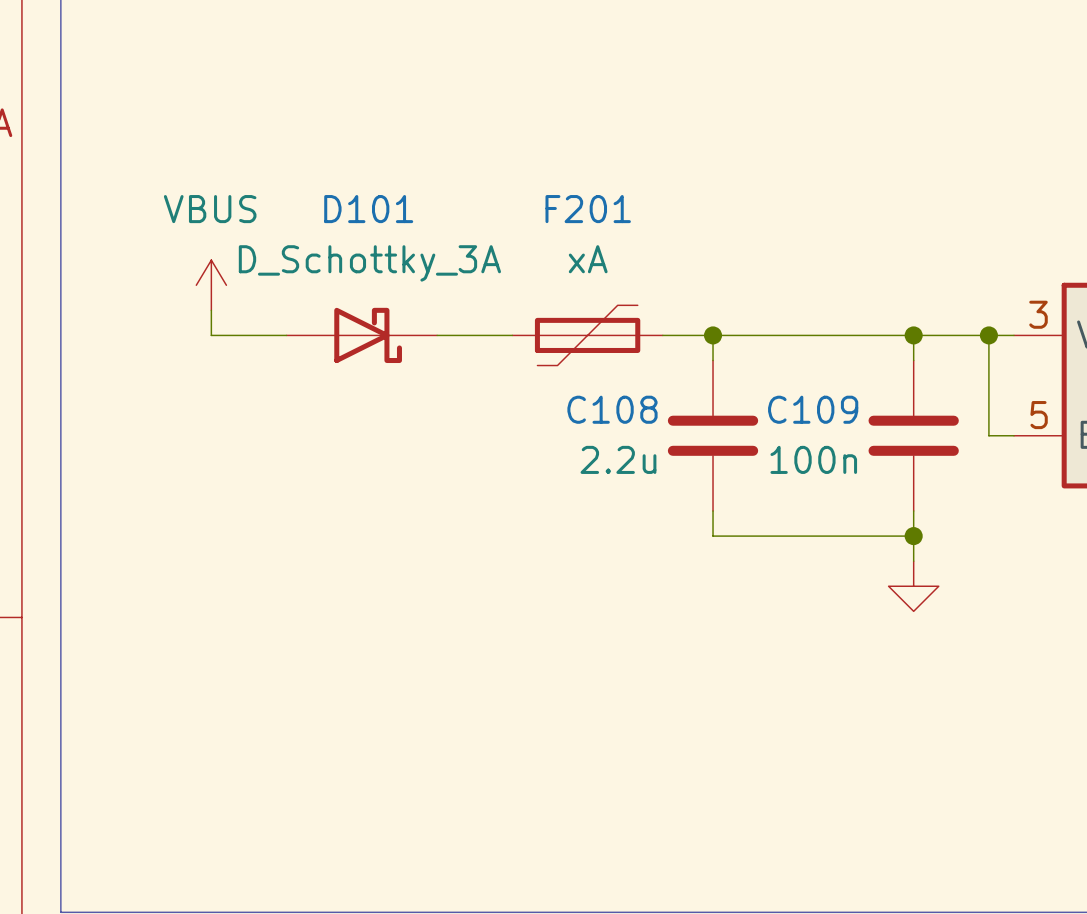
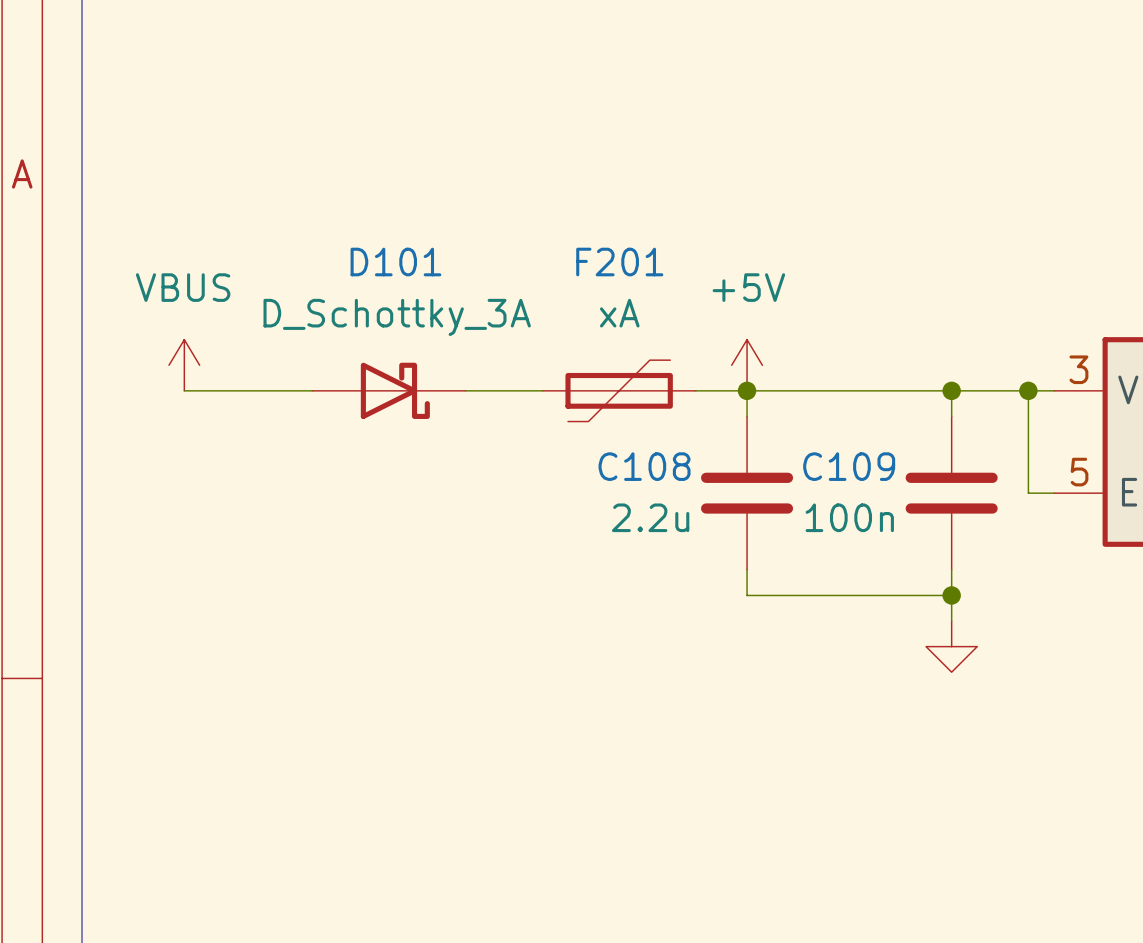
power symbol position: VBUS (211, 285) -> VBUS (184, 365)
wire: (211, 310) (211, 335) -> (184, 390) (235, 390)
power symbol: none -> +5V (747, 365)

